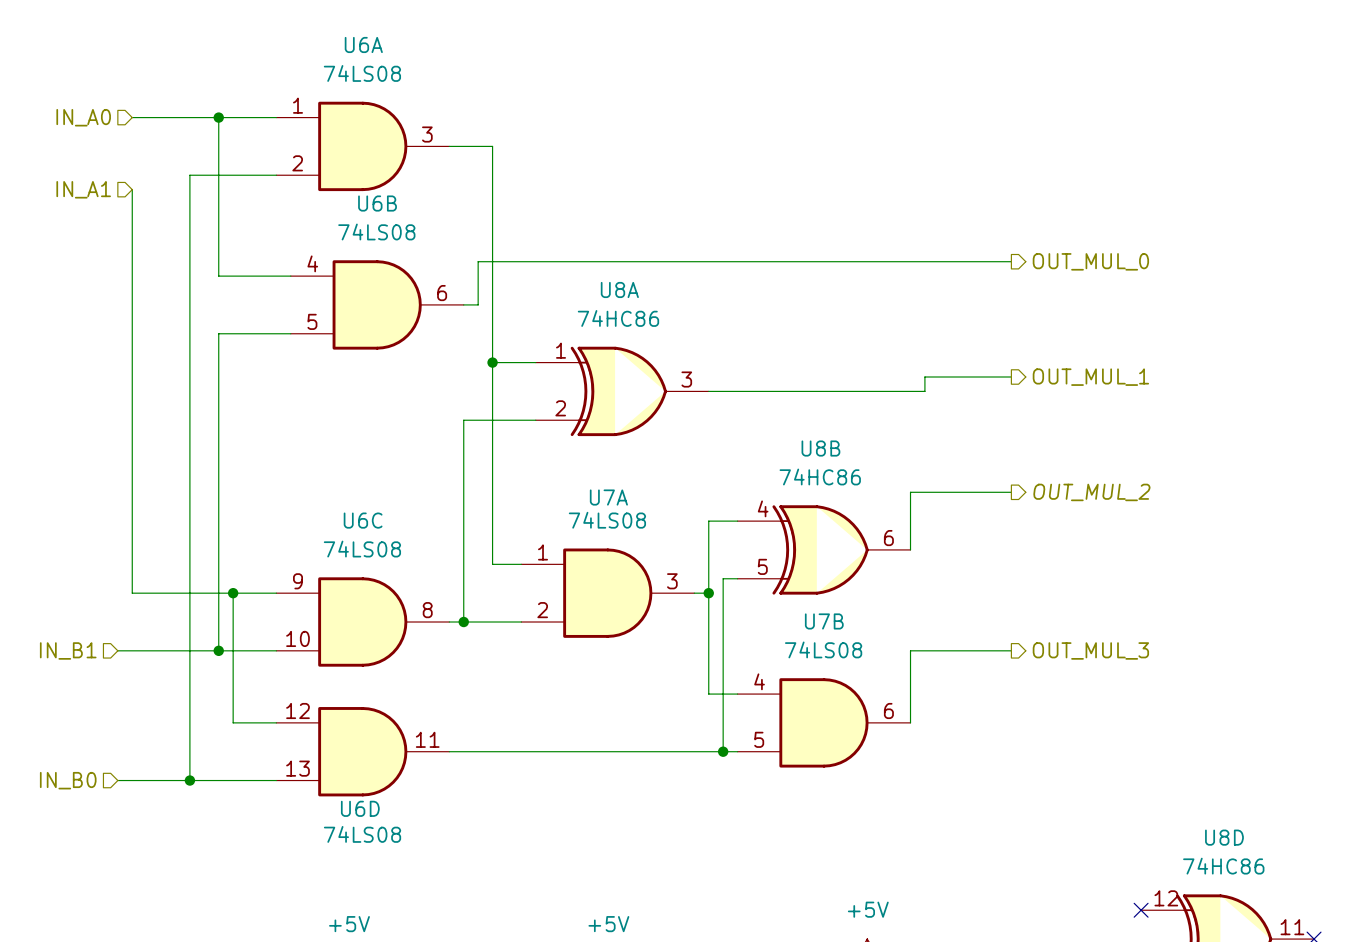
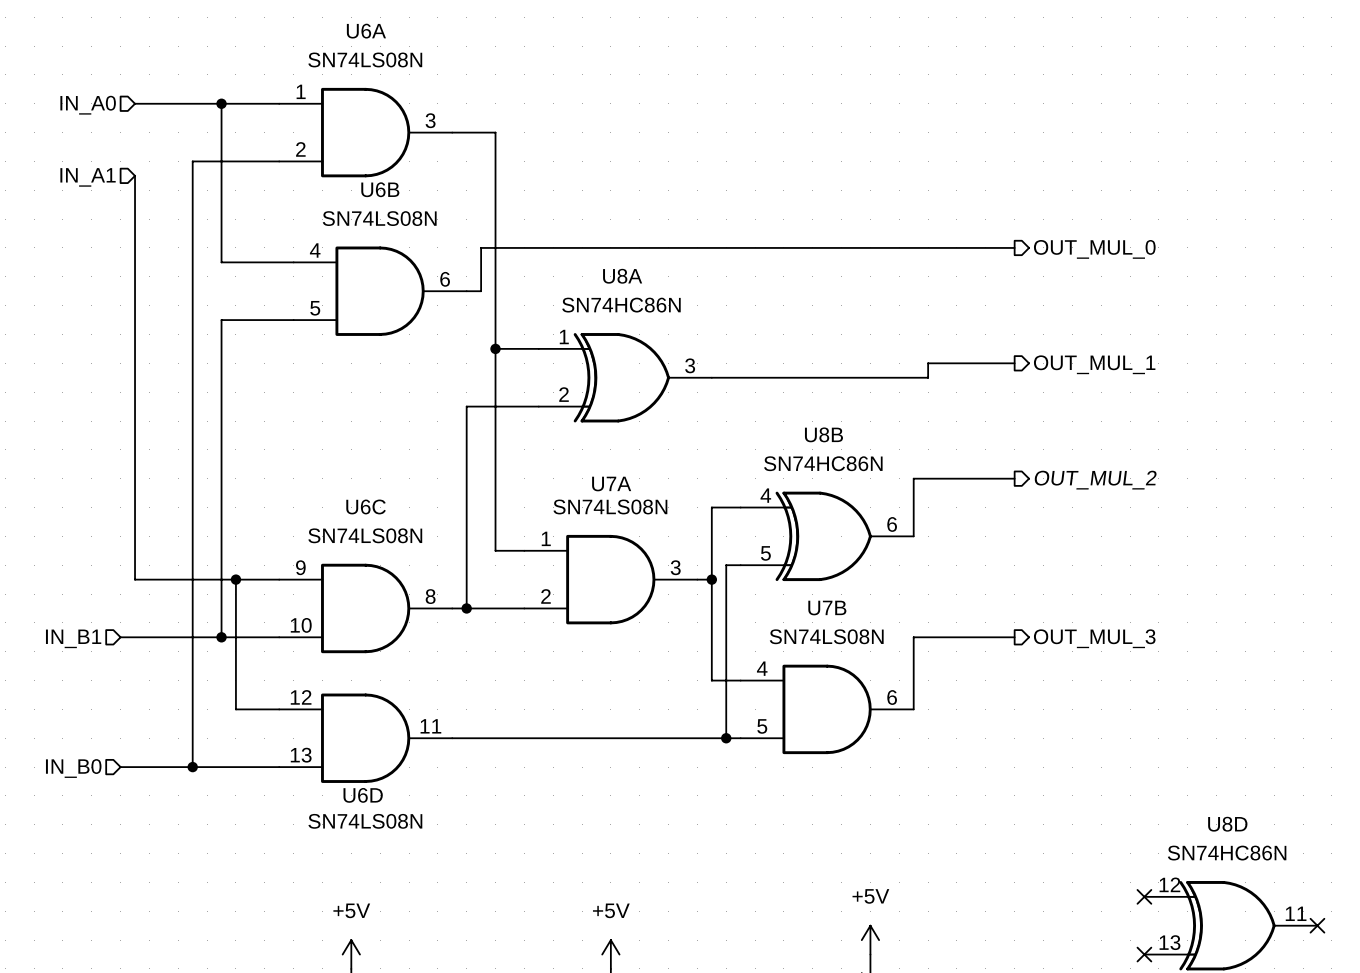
U6A value: 74LS08 (362, 73) -> SN74LS08N (365, 59)
U6B value: 74LS08 (376, 231) -> SN74LS08N (379, 218)
U8A value: 74HC86 (618, 318) -> SN74HC86N (621, 305)
U8B value: 74HC86 (820, 477) -> SN74HC86N (823, 463)
U7A value: 74LS08 (607, 520) -> SN74LS08N (610, 506)
U6C value: 74LS08 (362, 549) -> SN74LS08N (365, 535)
U7B value: 74LS08 (823, 649) -> SN74LS08N (826, 636)
U6D value: 74LS08 (362, 834) -> SN74LS08N (365, 821)
U8D value: 74HC86 (1223, 866) -> SN74HC86N (1227, 853)

